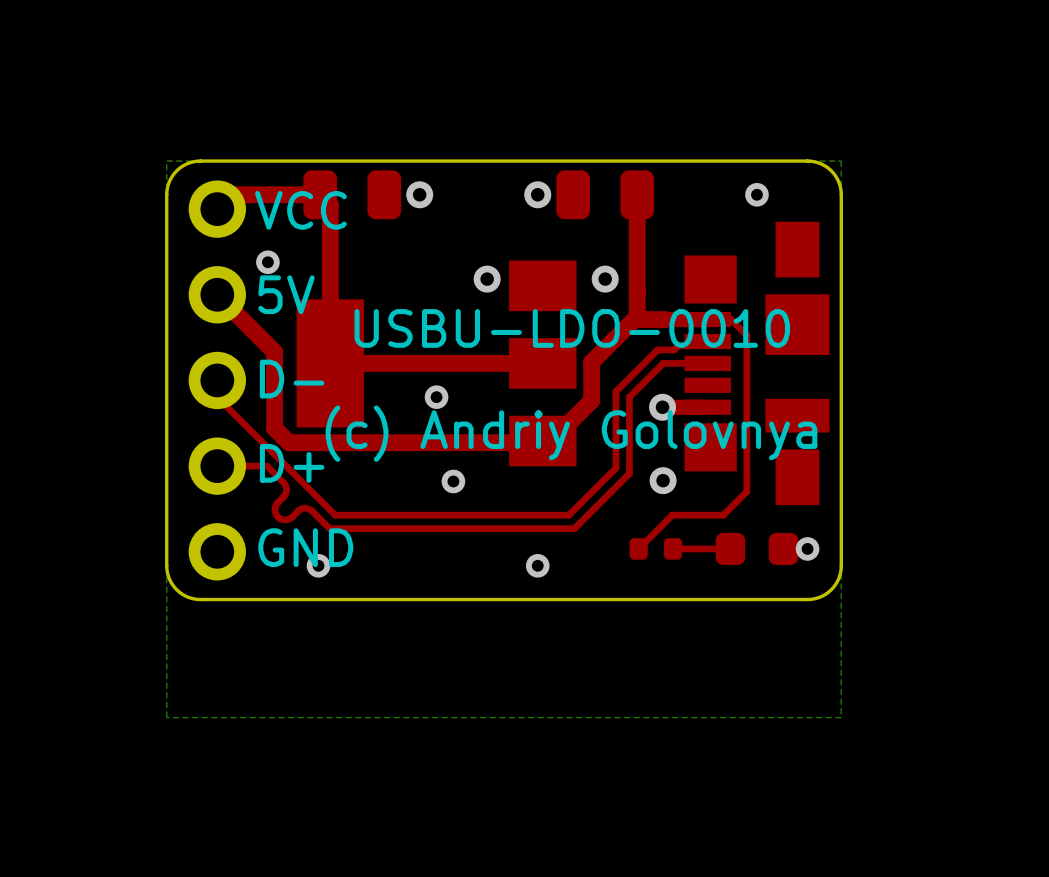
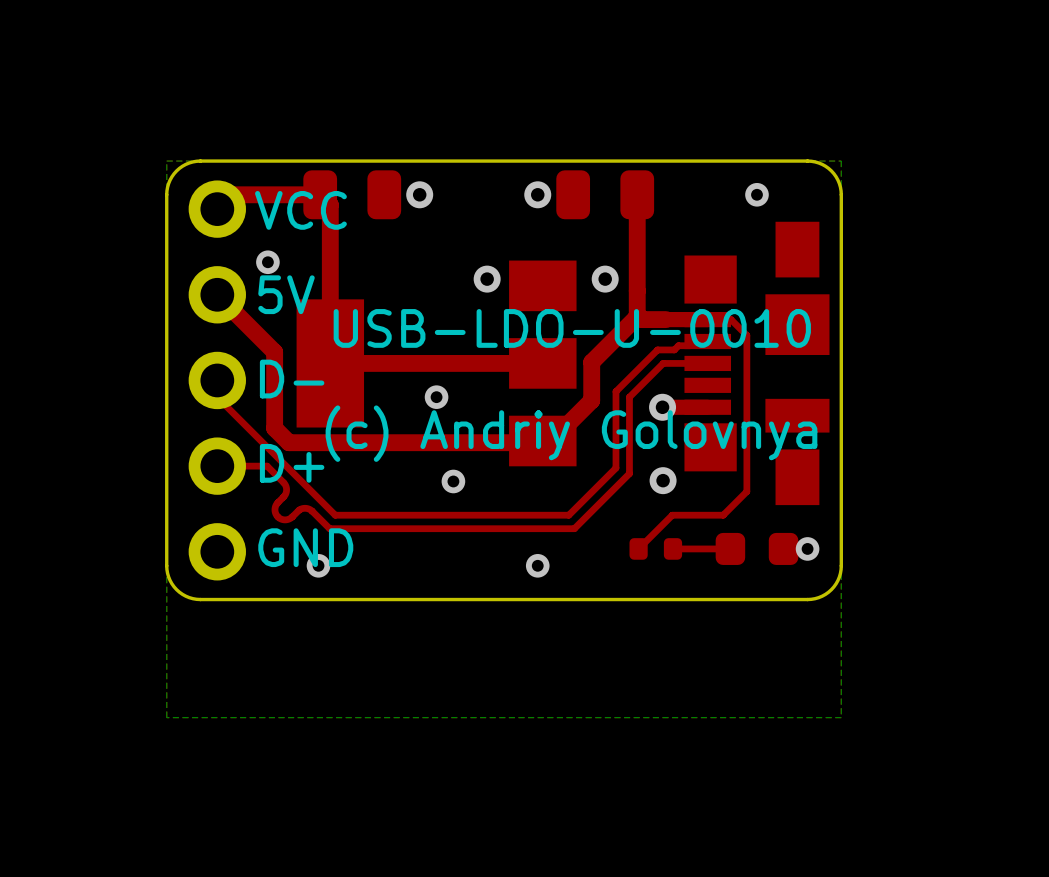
text: USBU-LDO-0010 (572, 328) -> USB-LDO-U-0010 (572, 328)

